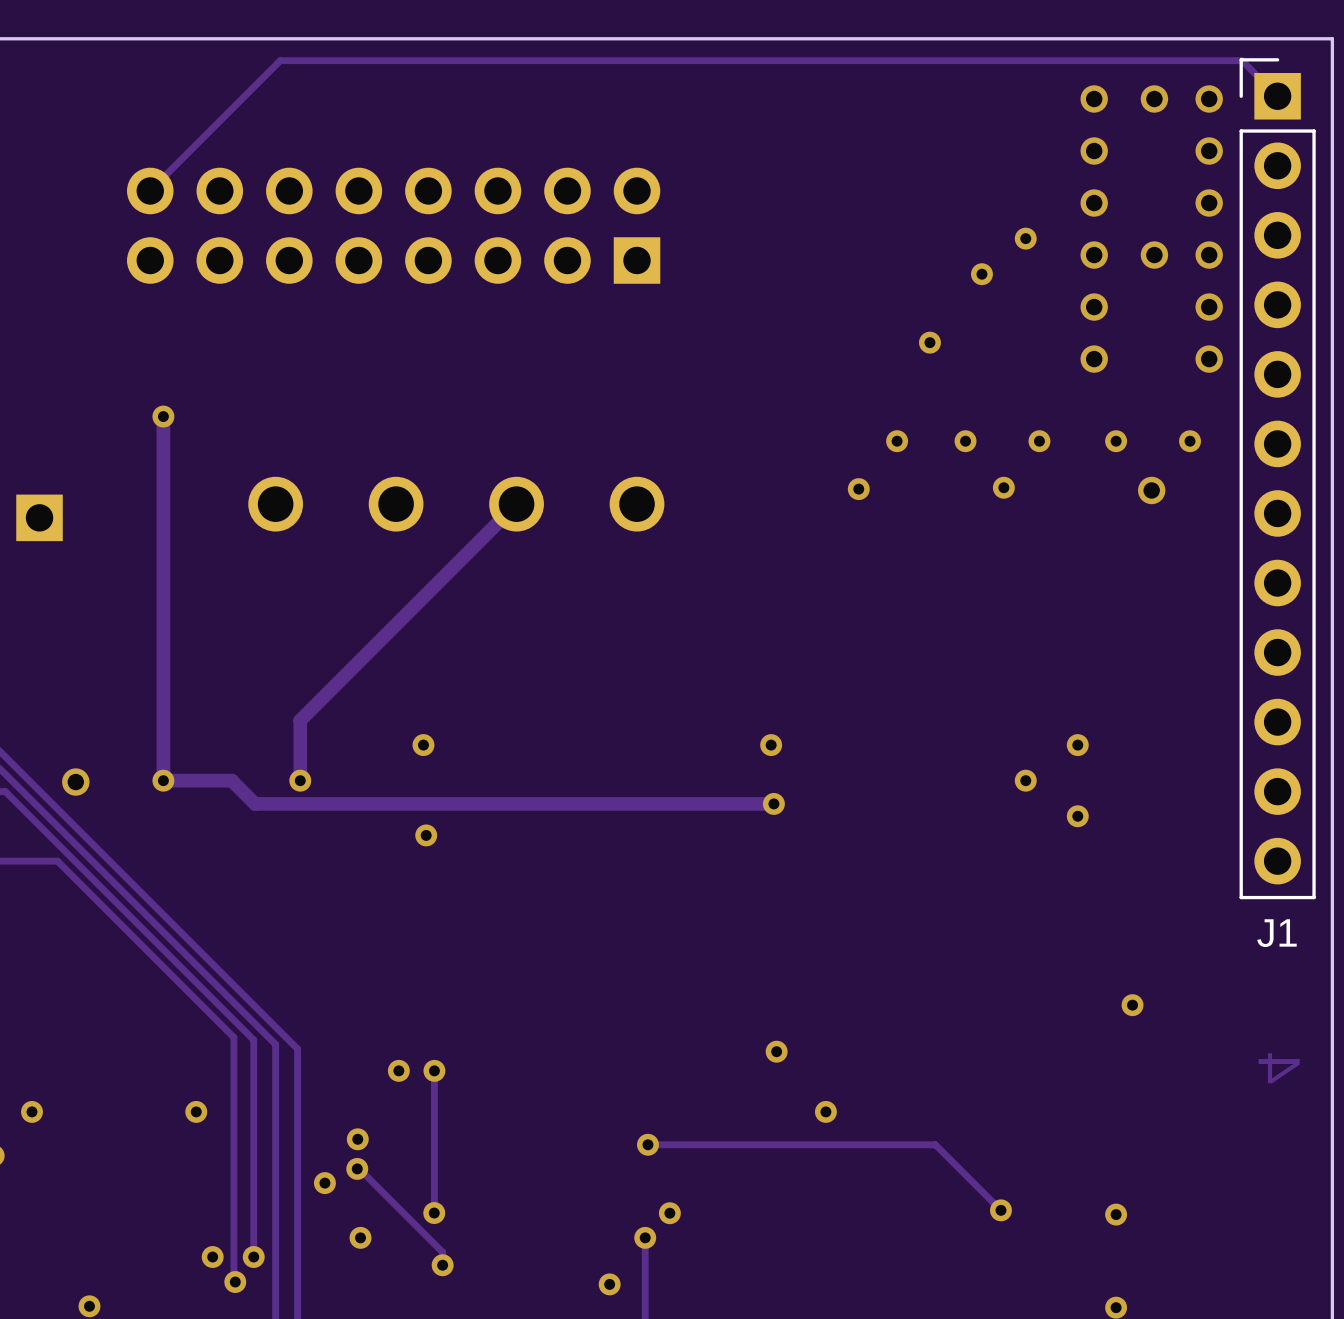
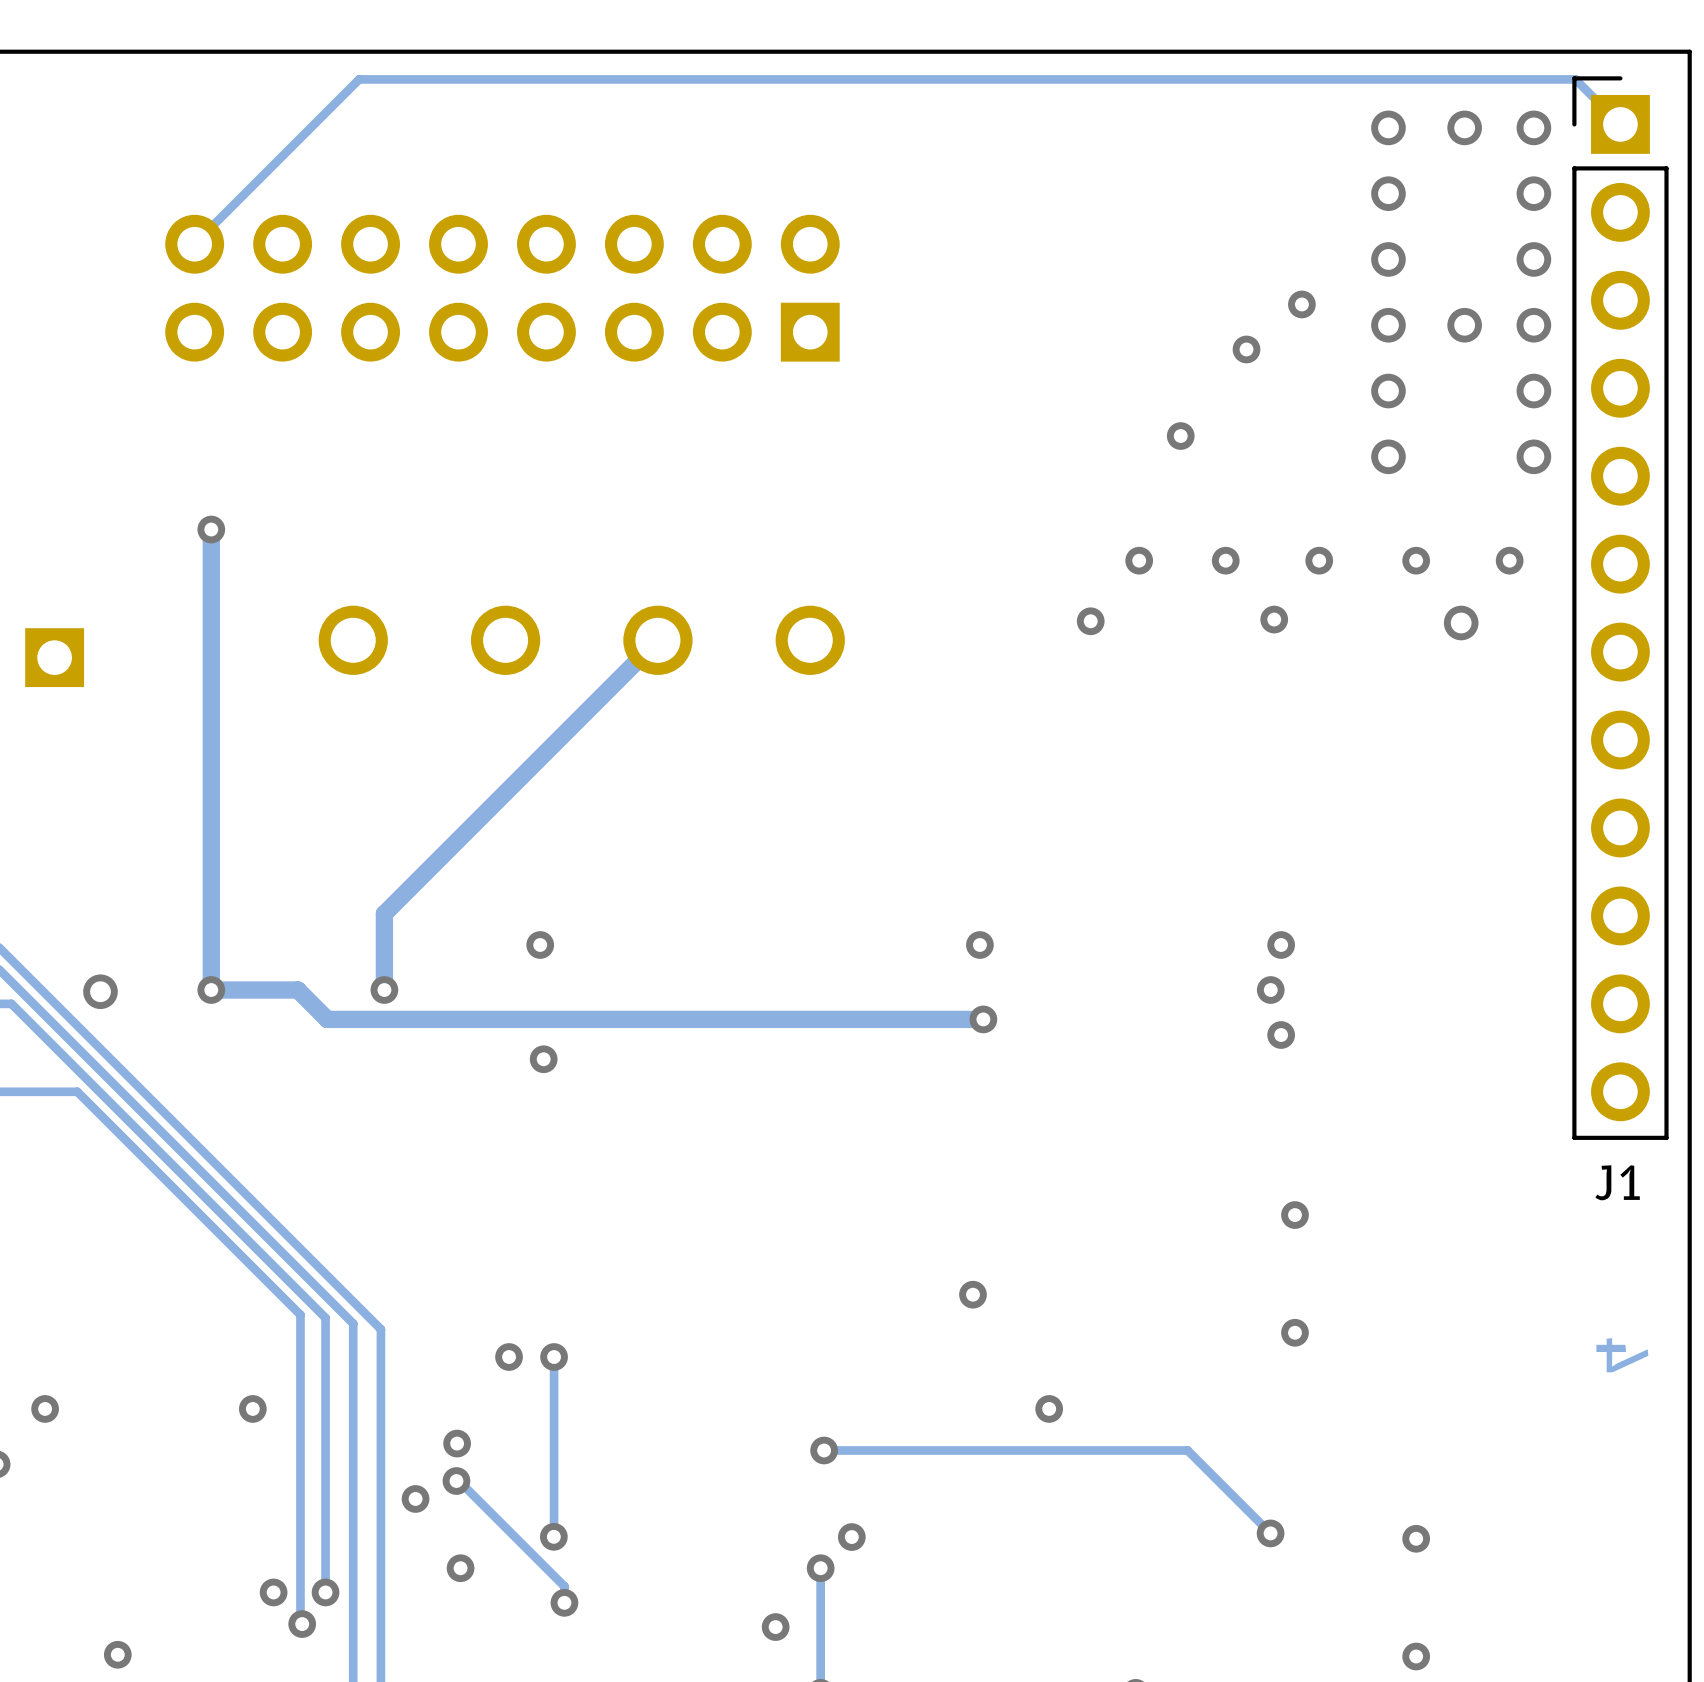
via: none -> (1281, 945)
via: (1077, 745) -> none
via: none -> (1270, 990)
via: (1025, 780) -> none
via: none -> (1281, 1035)
via: (1077, 816) -> none
via: none -> (1294, 1215)
via: (1132, 1005) -> none
via position: (776, 1051) -> (973, 1294)
via: none -> (1294, 1332)

